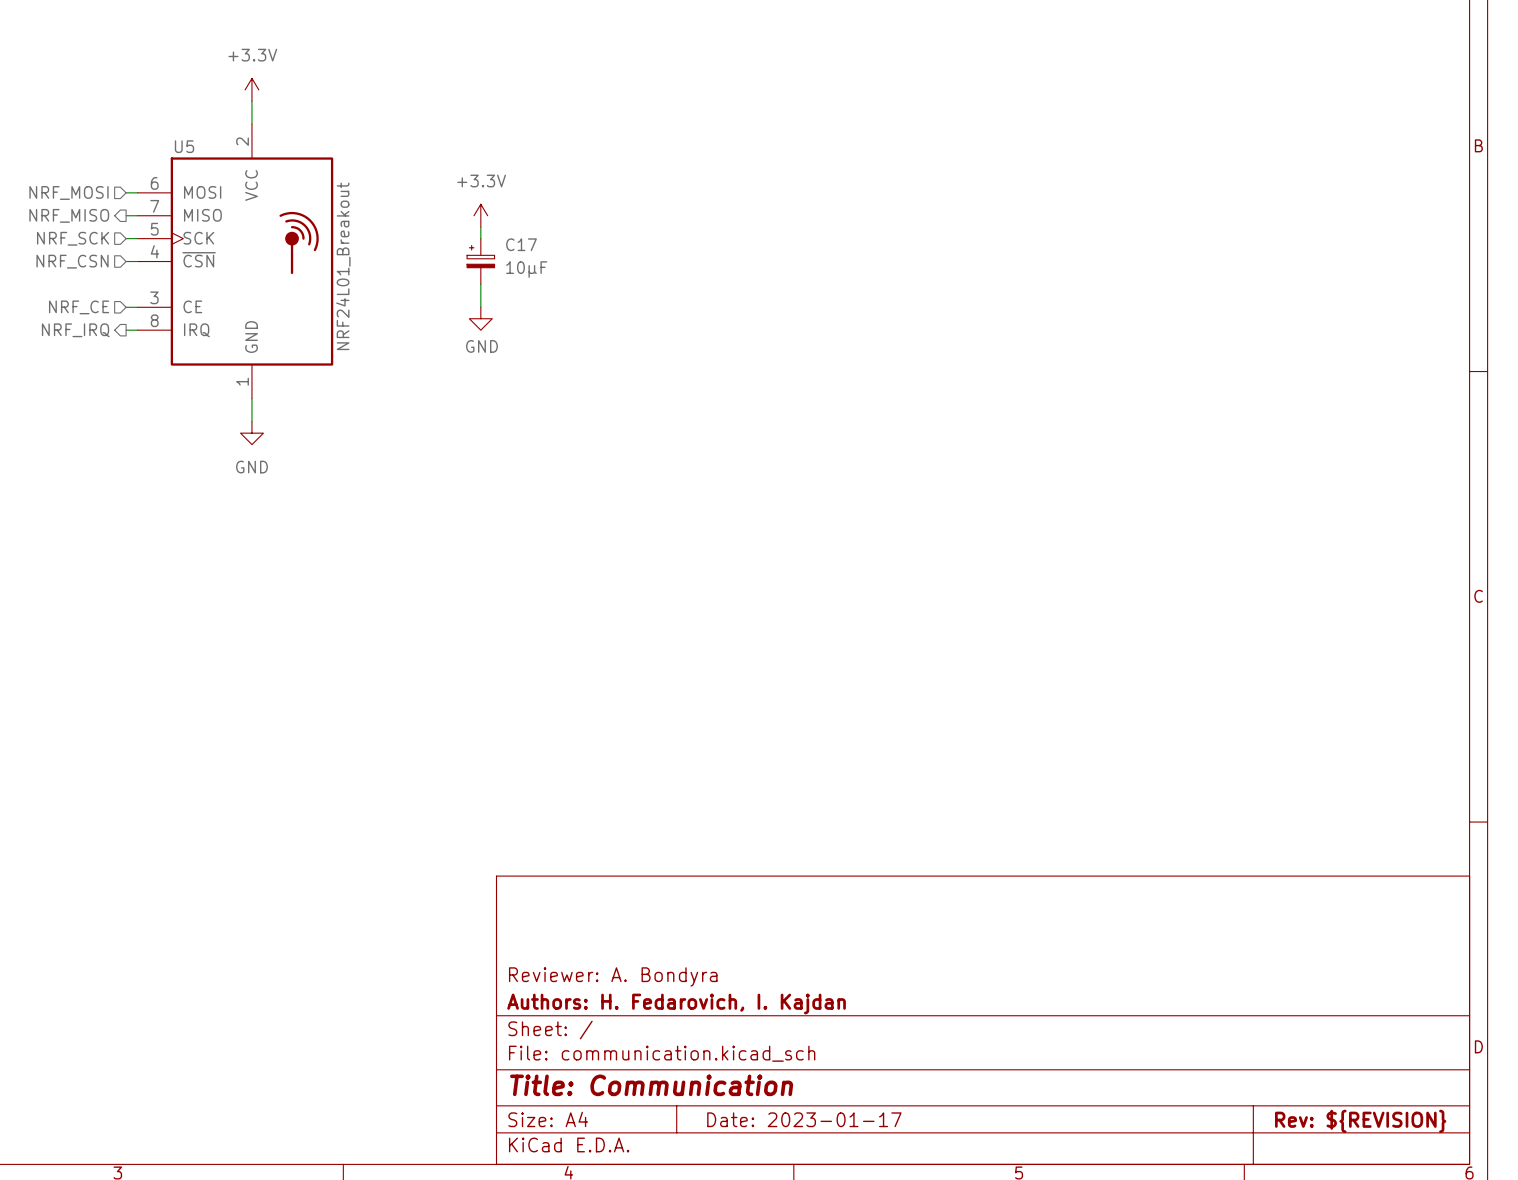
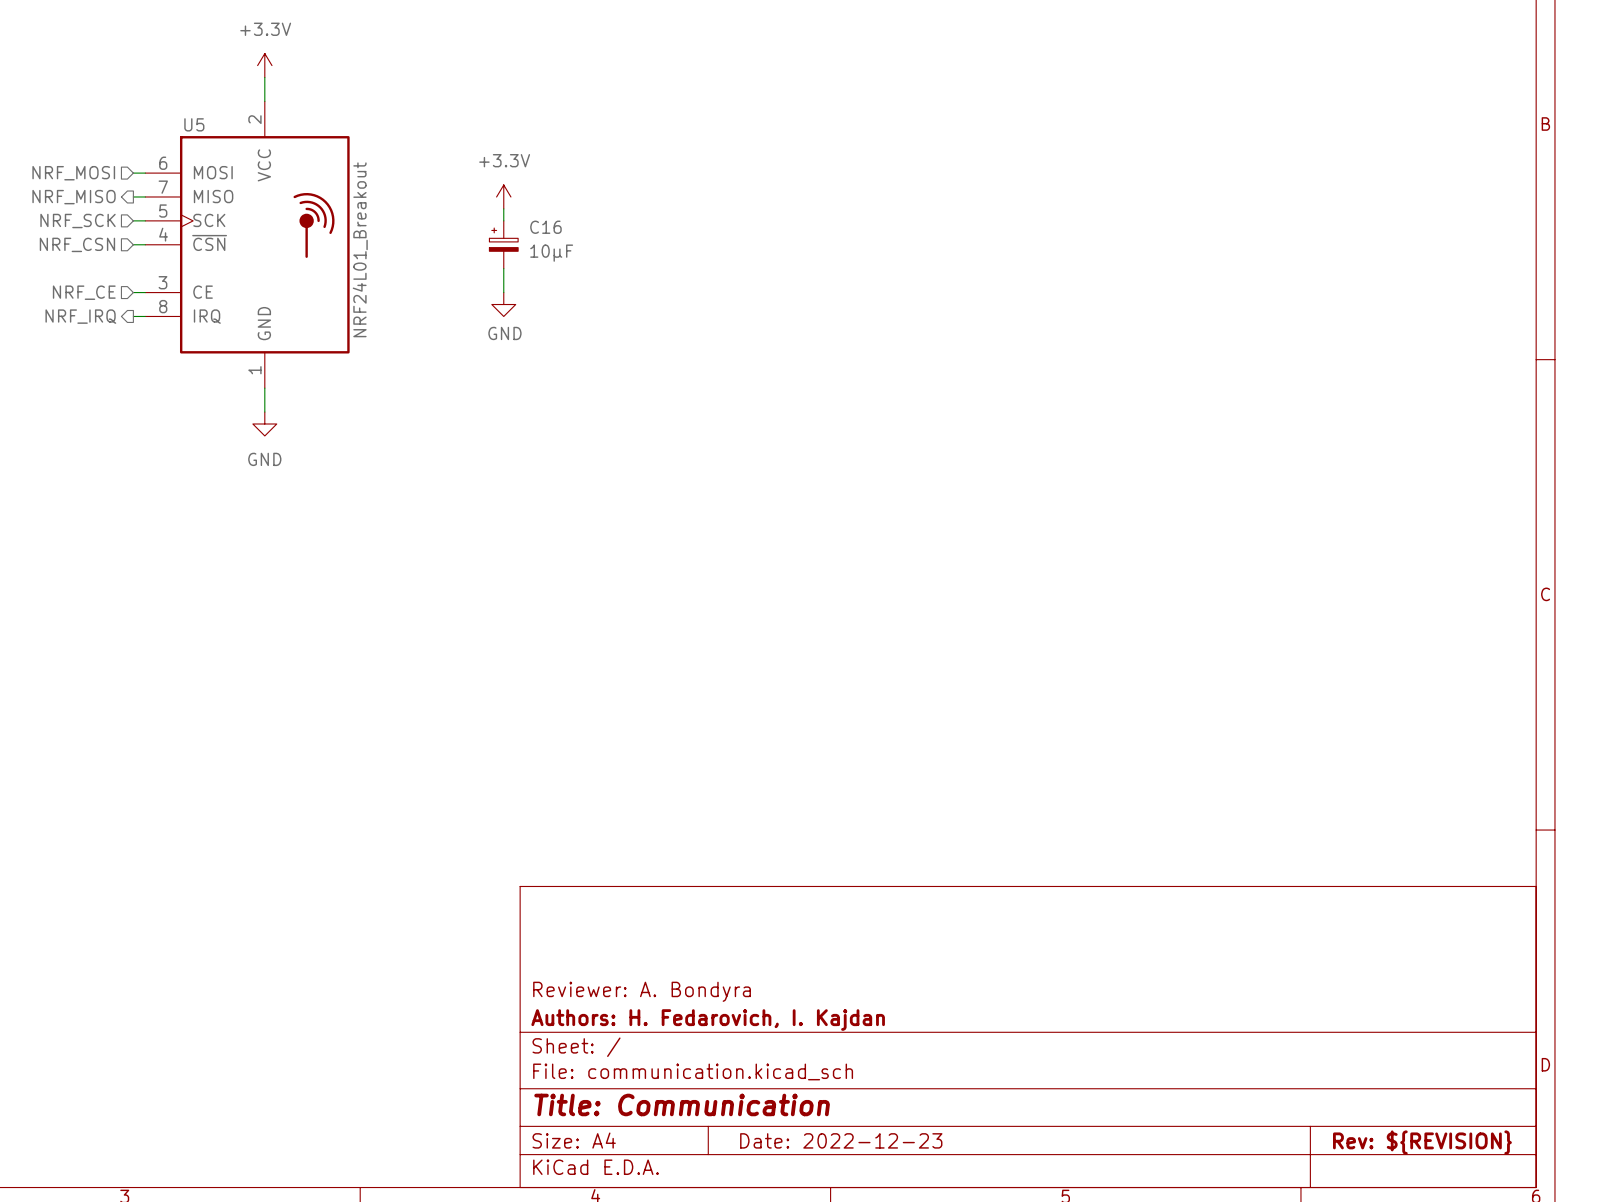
C17 name: C17 (521, 244) -> C16 (545, 227)
title block: Date: 2023-01-17 (804, 1119) -> Date: 2022-12-23 (841, 1140)

